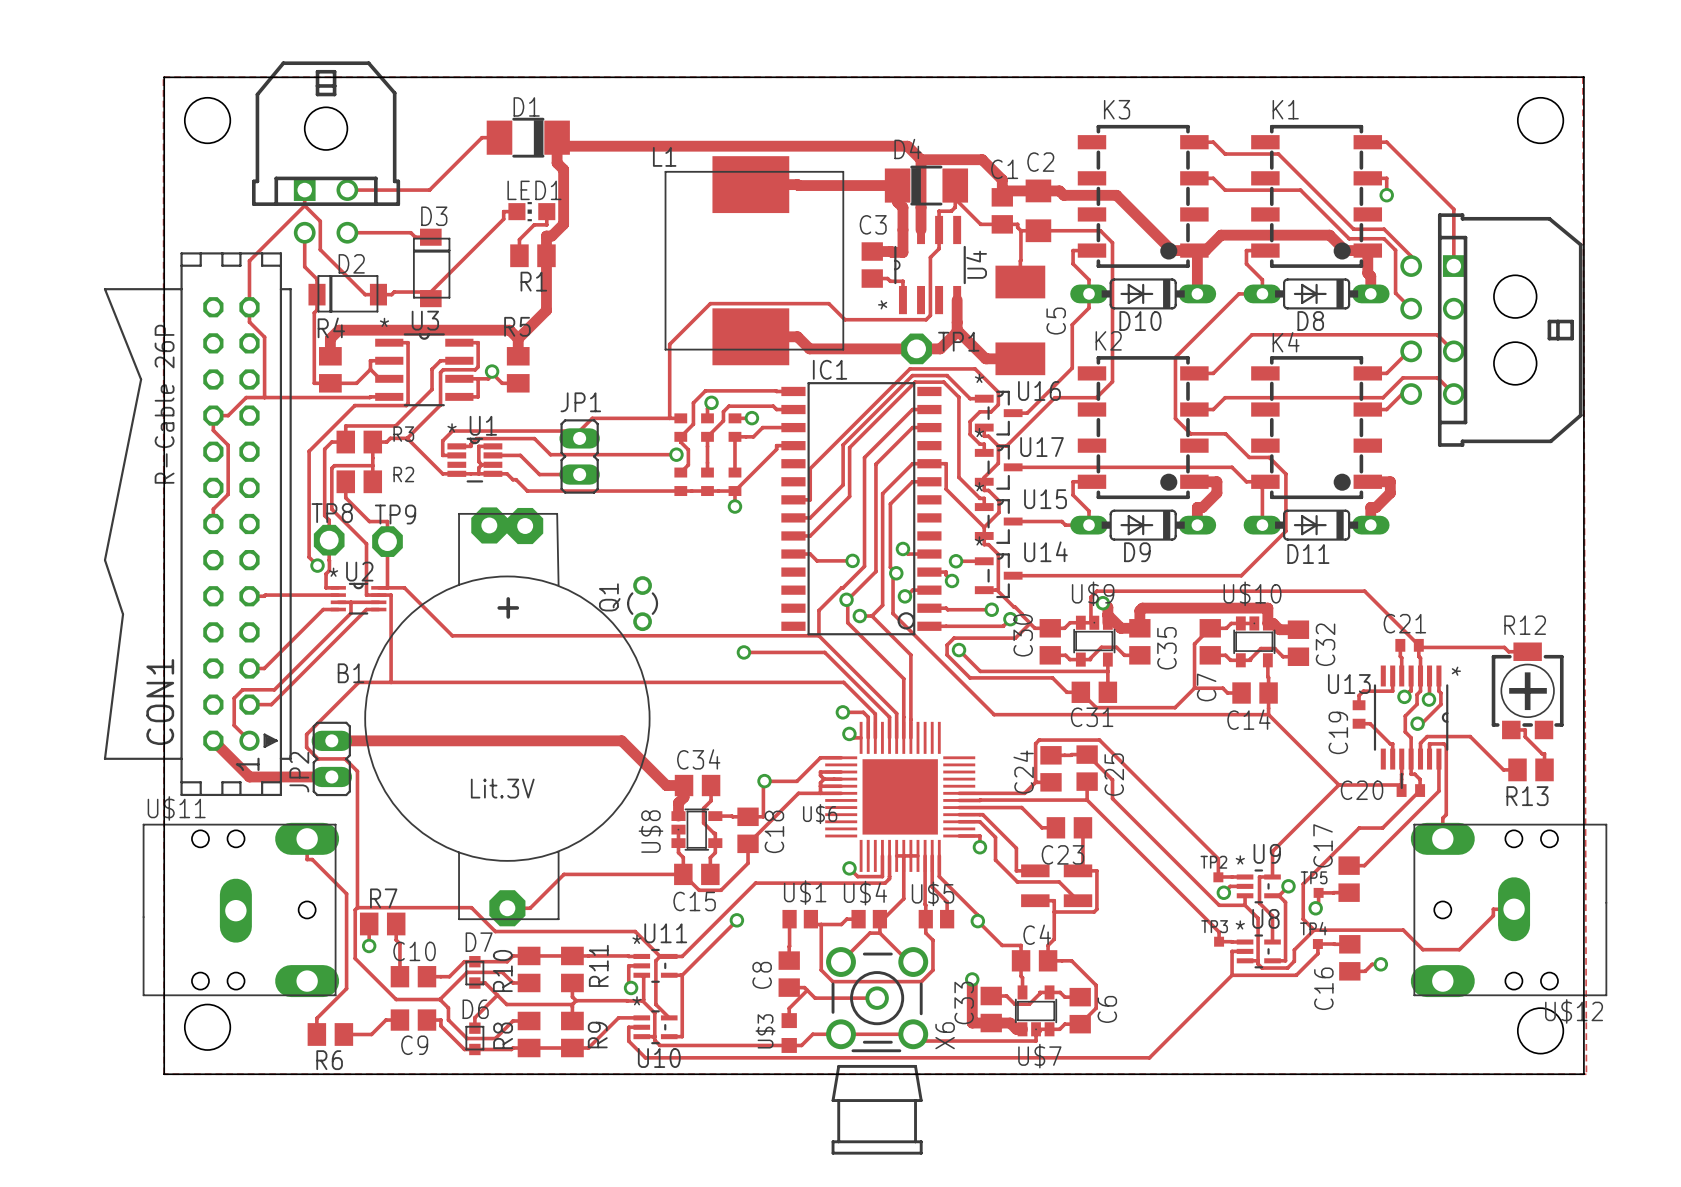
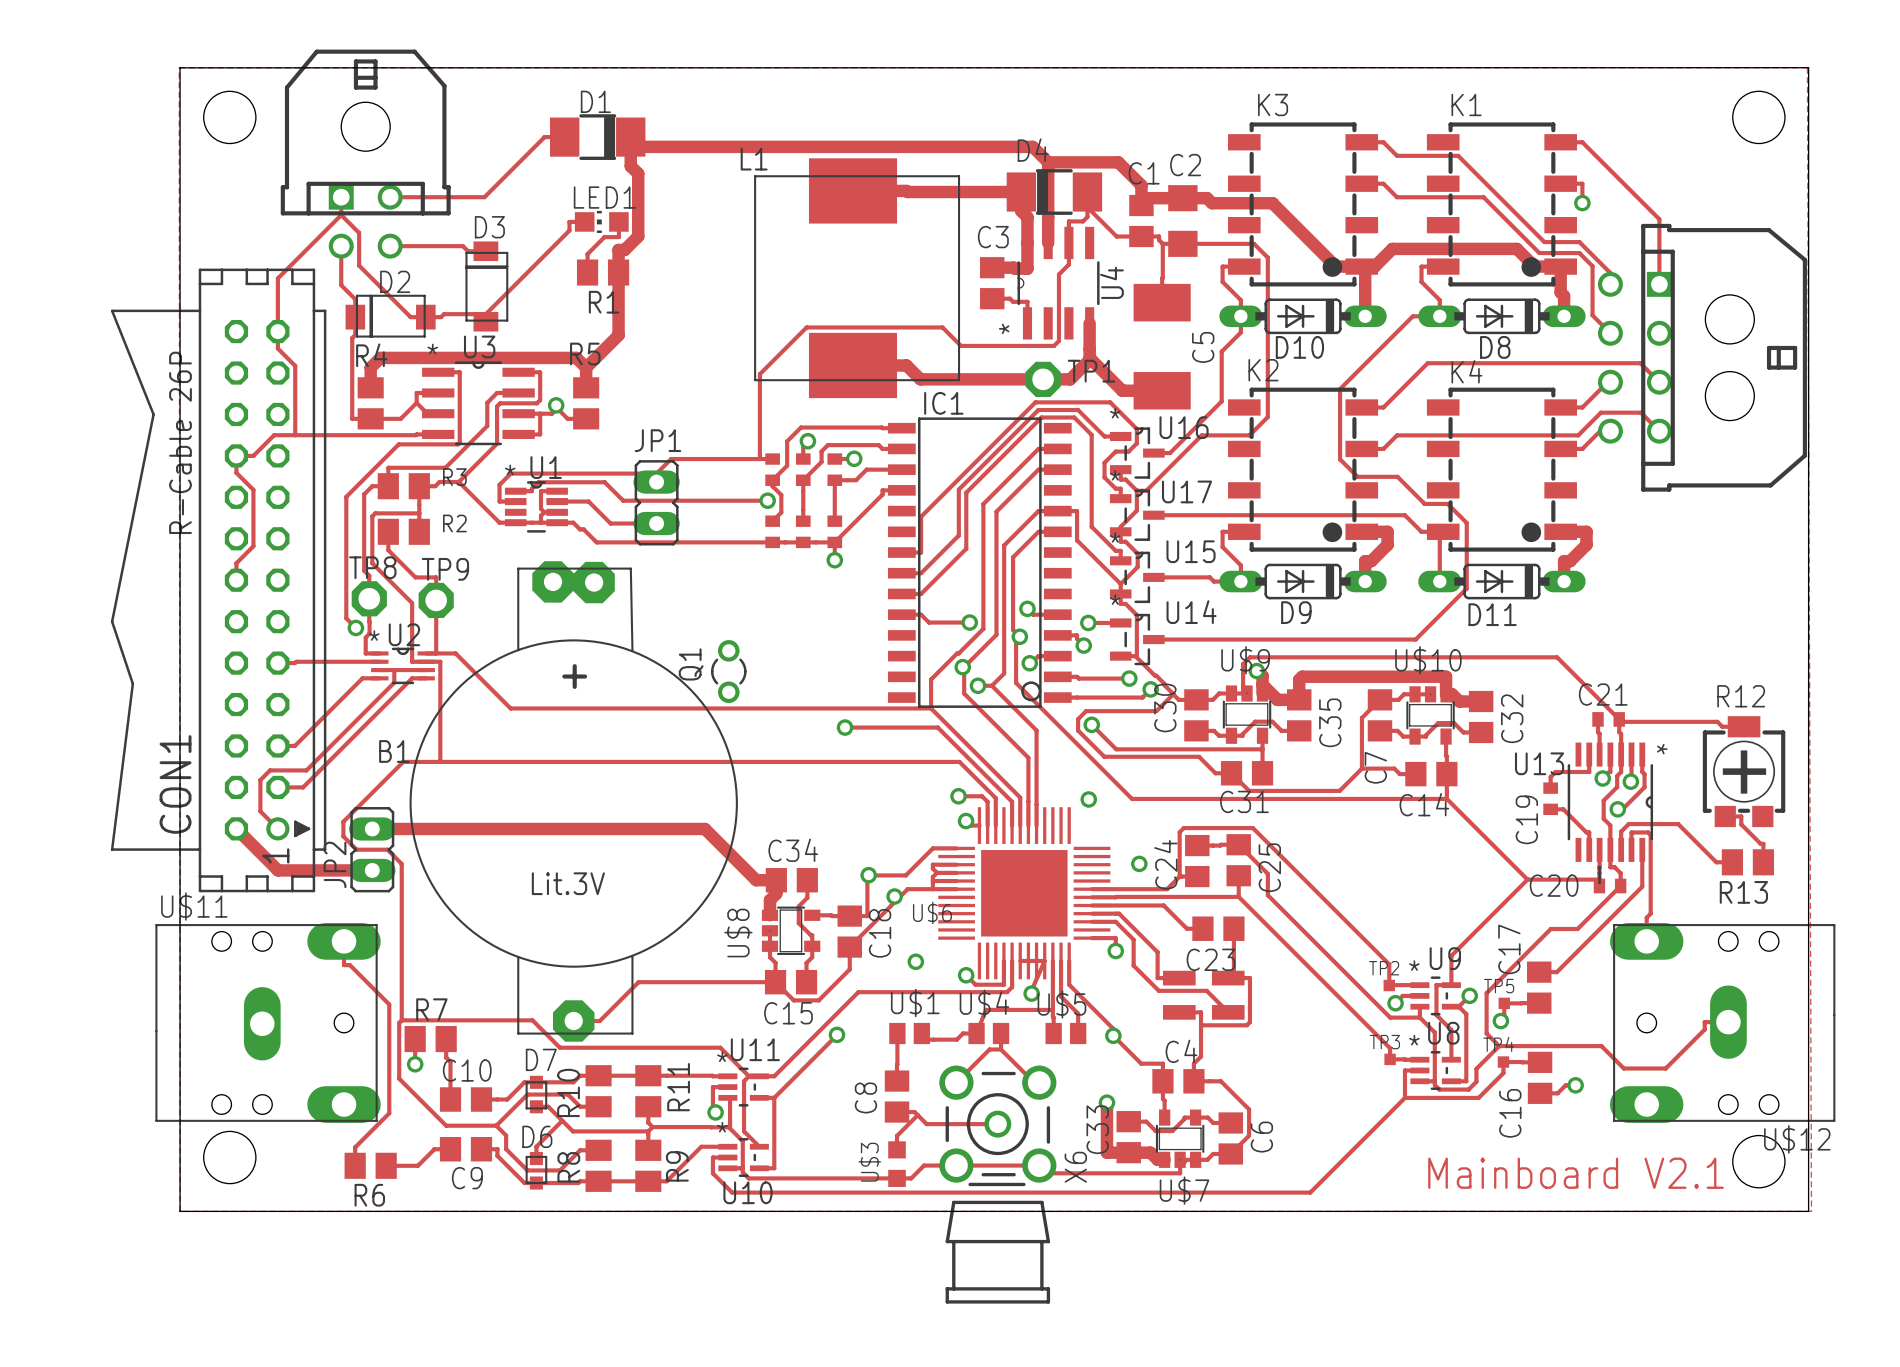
via: none -> (1088, 799)
via: none -> (1139, 863)
via: none -> (894, 896)
track: (903, 855) (903, 898) (879, 922) -> none
track: none -> (1044, 960) (1031, 991)
via: none -> (915, 961)
via: none -> (1031, 993)
track: none -> (1052, 1009) (985, 1009) (976, 1033)
track: (925, 919) (925, 933) (932, 940) (932, 970) (921, 981) (832, 981) (821, 970) (821, 924) -> none
text: none -> Mainboard V2.1 (1576, 1173)

